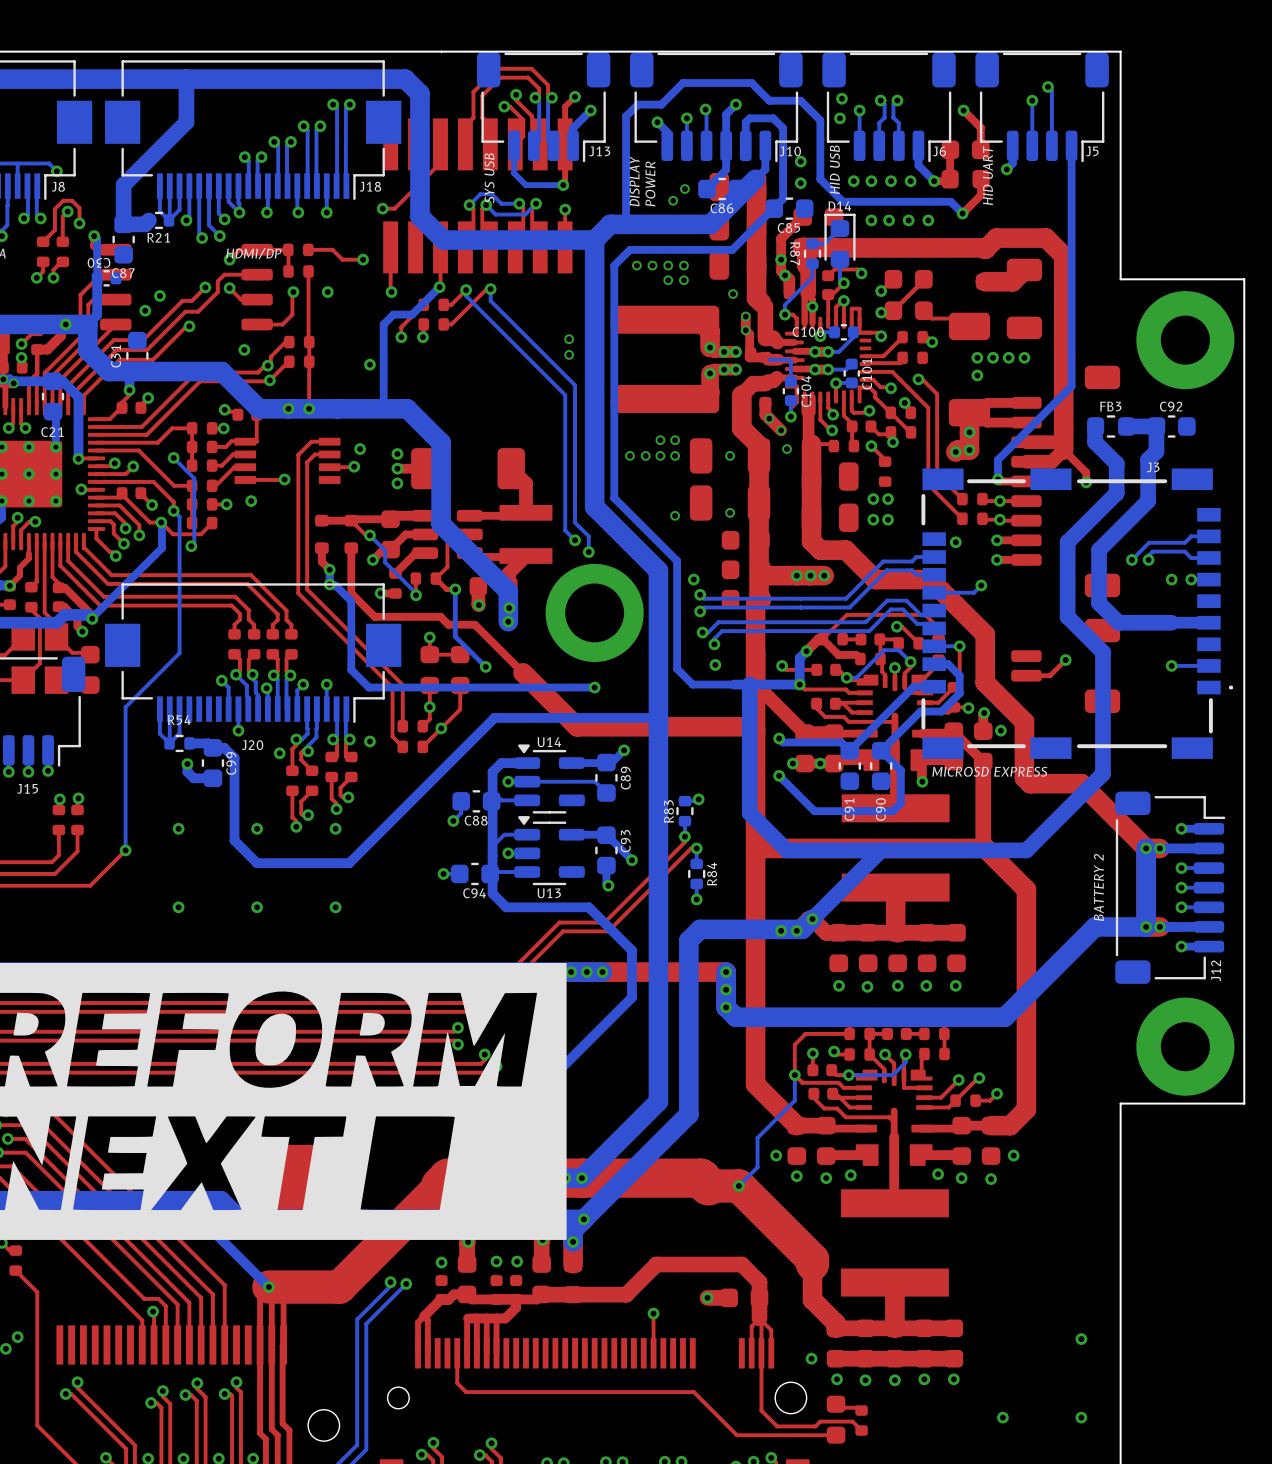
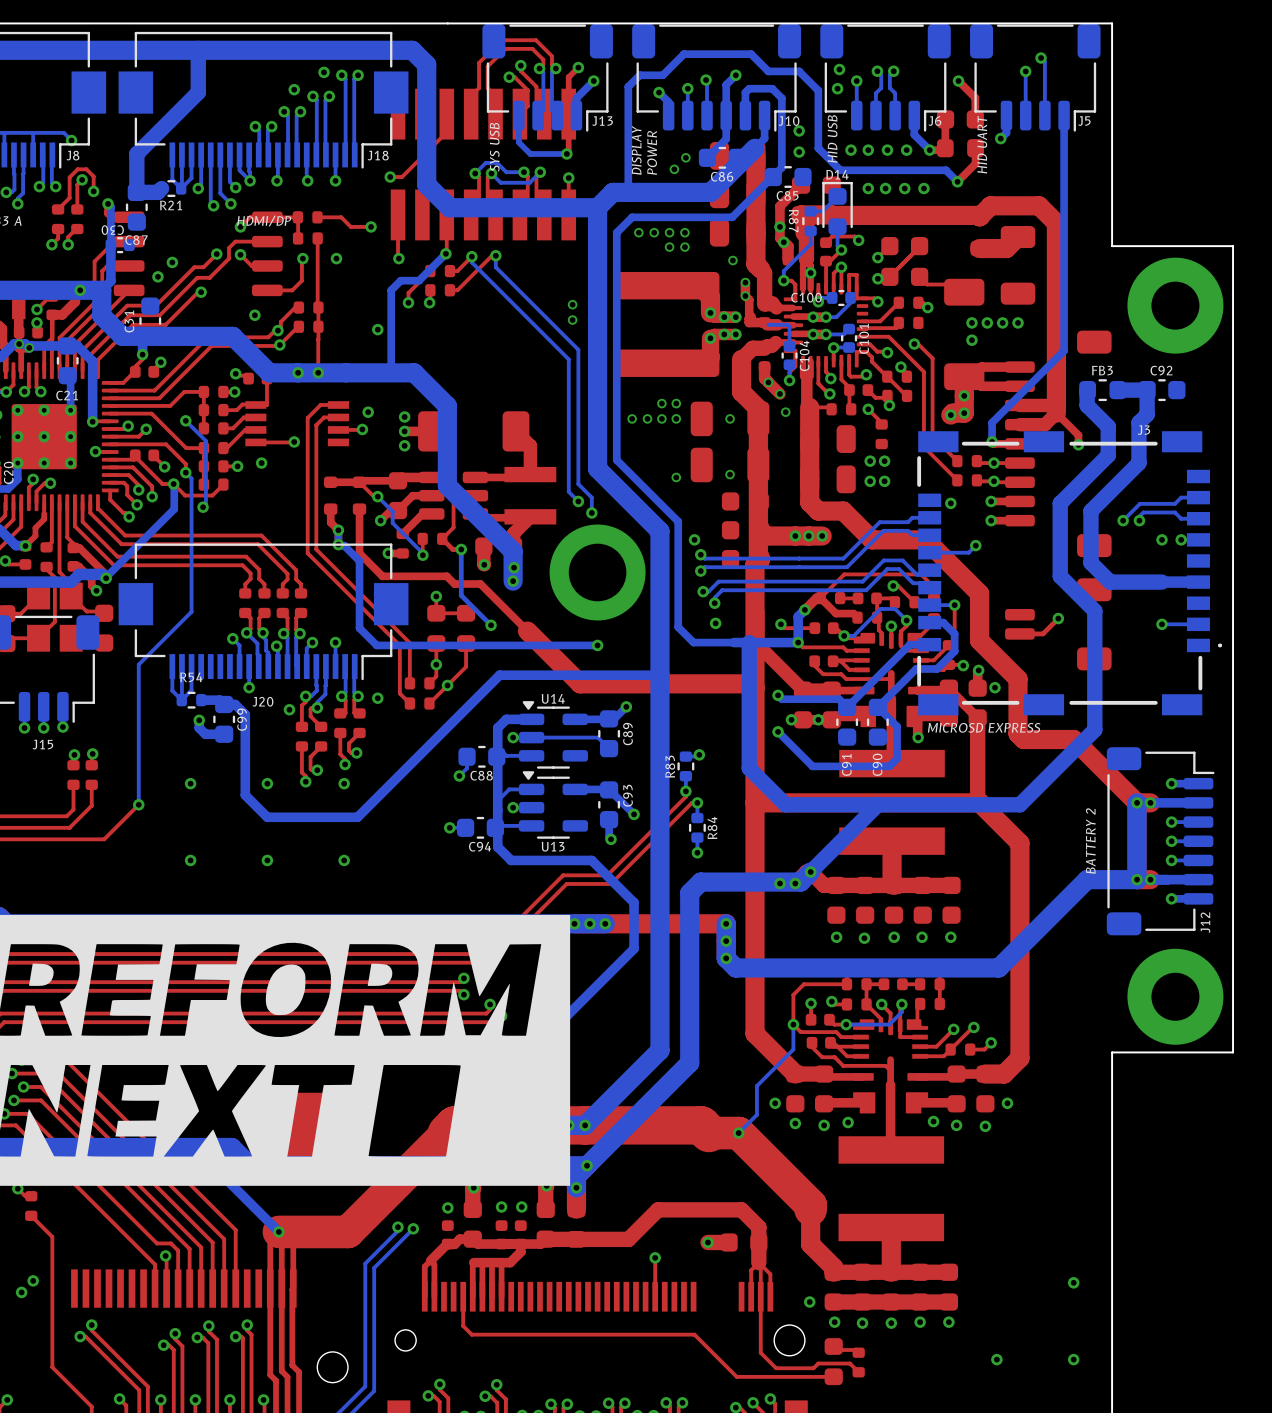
via: none -> (324, 72)
via: none -> (294, 89)

